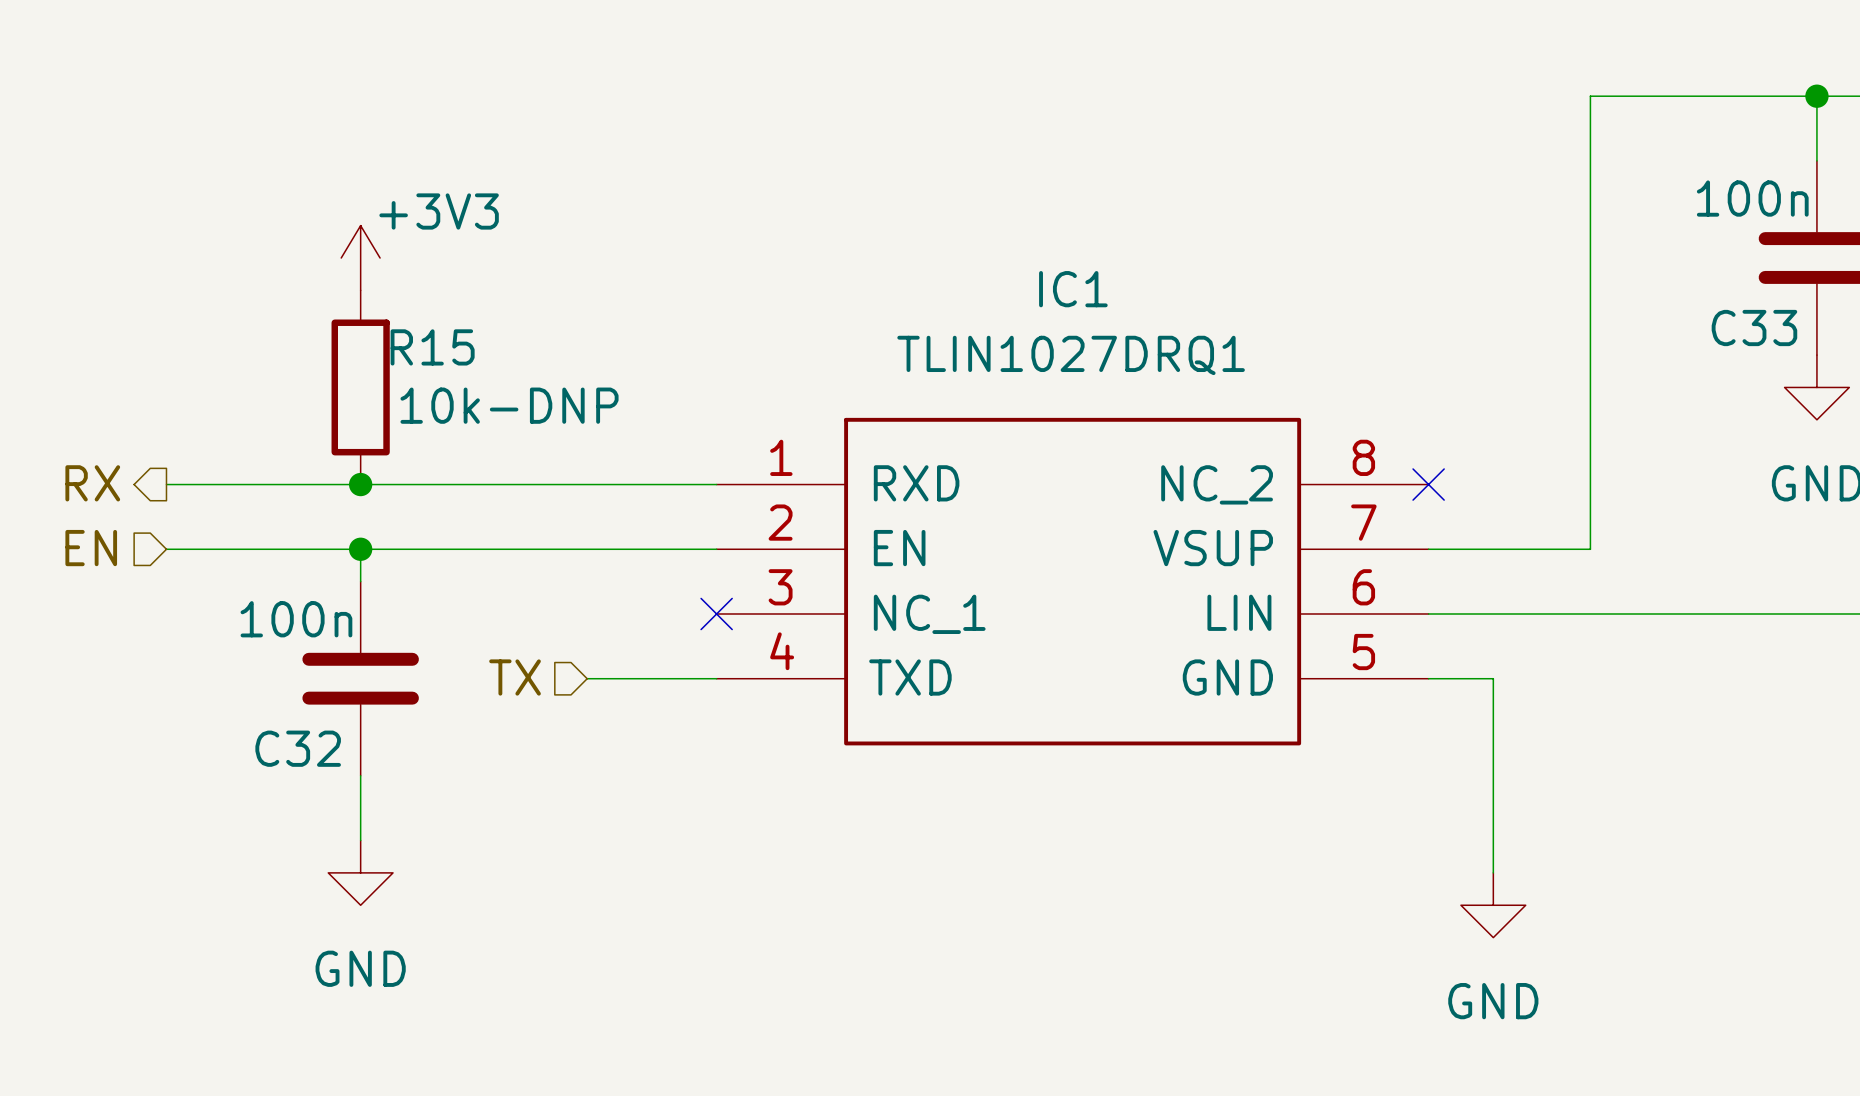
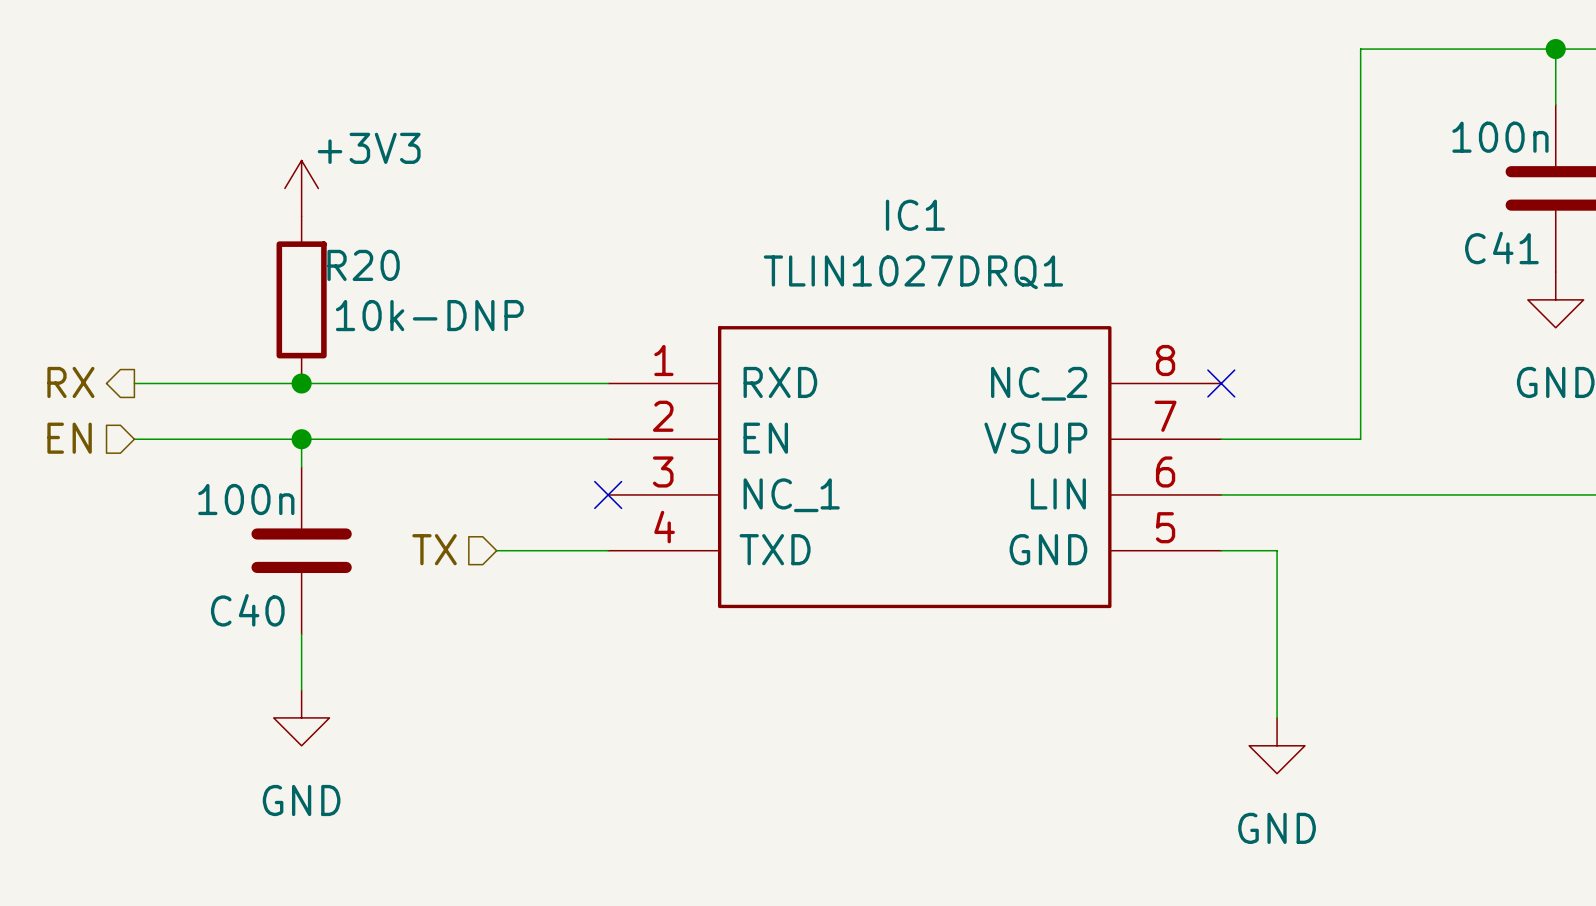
C33 name: C33 (1754, 328) -> C41 (1501, 248)
R15 name: R15 (432, 347) -> R20 (363, 265)
C32 name: C32 (298, 748) -> C40 (247, 610)

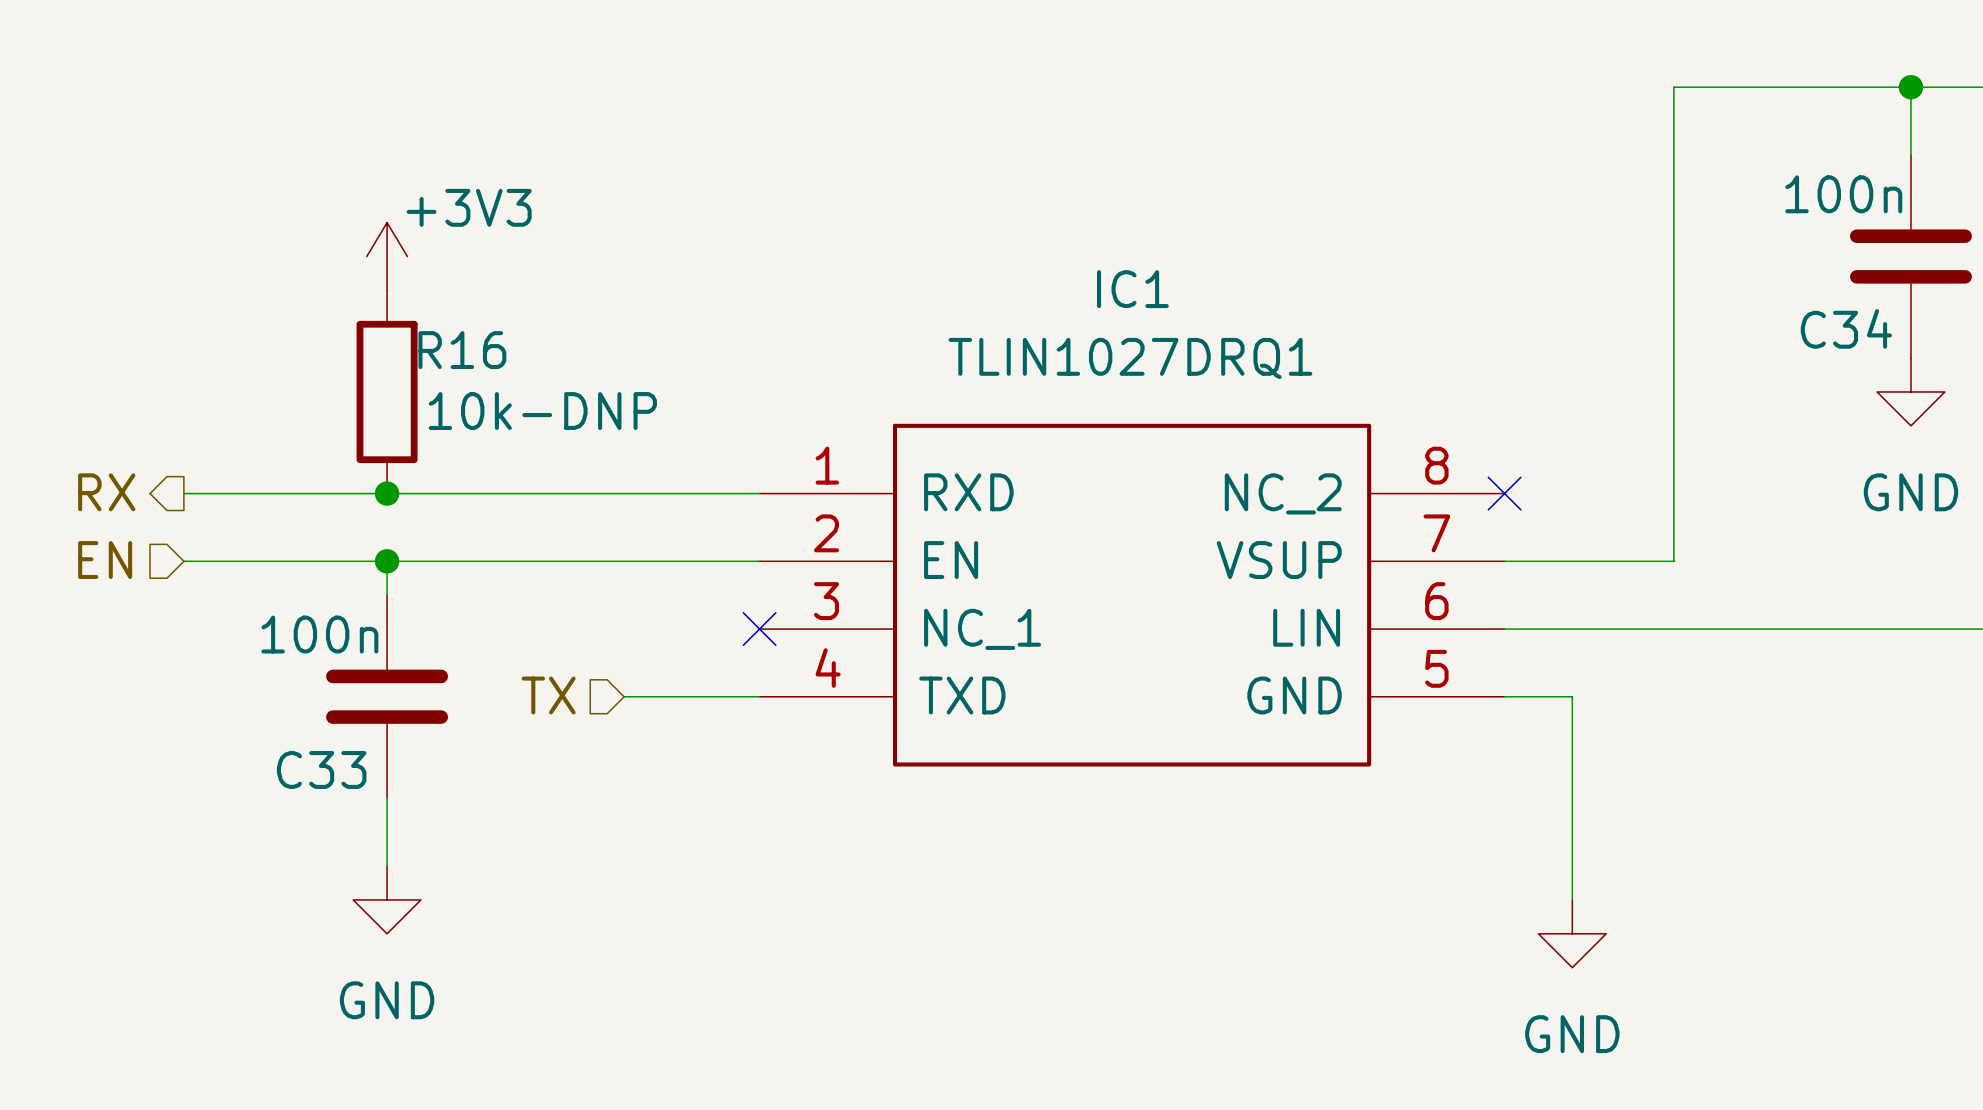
C41 name: C41 (1501, 248) -> C34 (1846, 328)
R20 name: R20 (363, 265) -> R16 (462, 350)
C40 name: C40 (247, 610) -> C33 (321, 769)

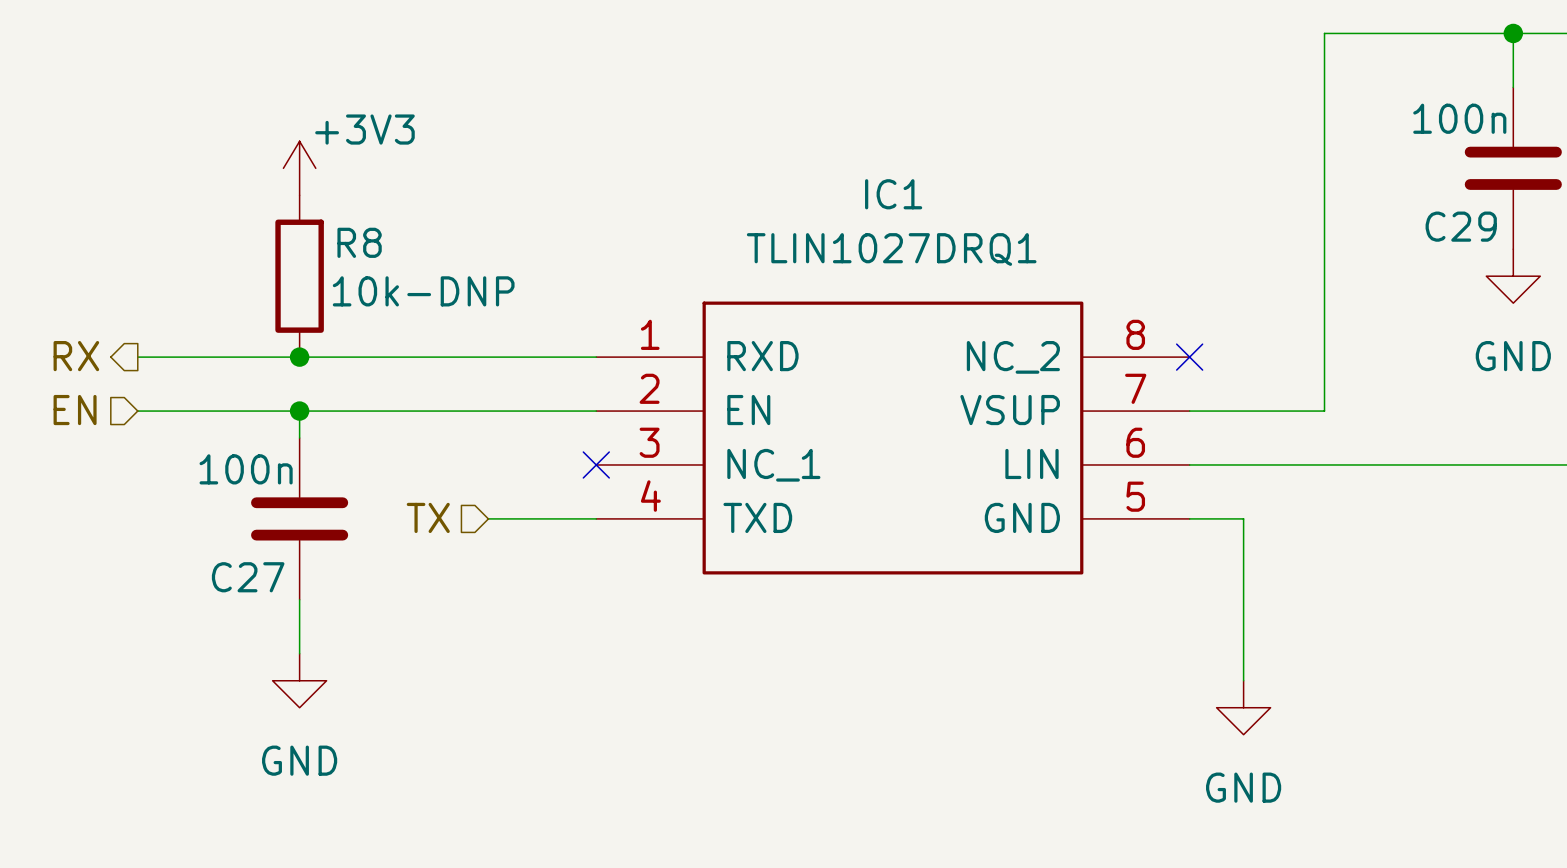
C34 name: C34 (1846, 328) -> C29 (1461, 226)
R16 name: R16 (462, 350) -> R8 (359, 242)
C33 name: C33 (321, 769) -> C27 (248, 577)

